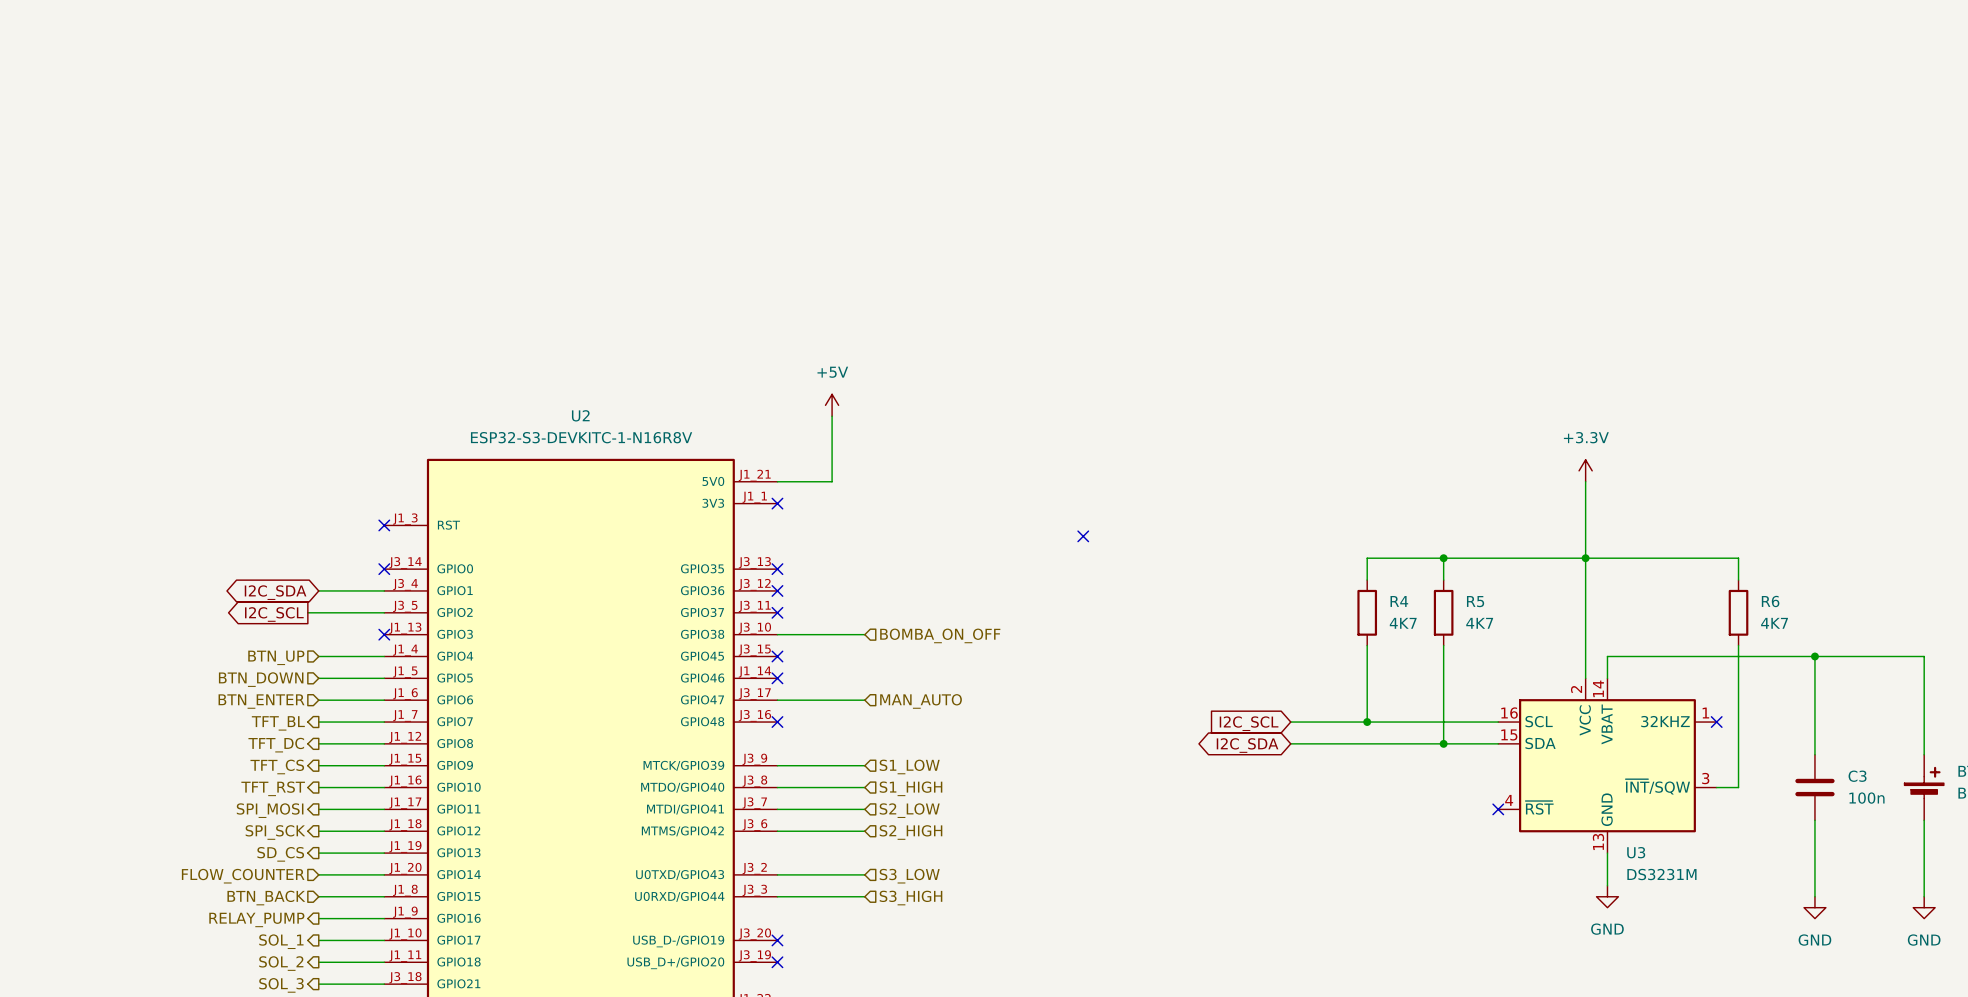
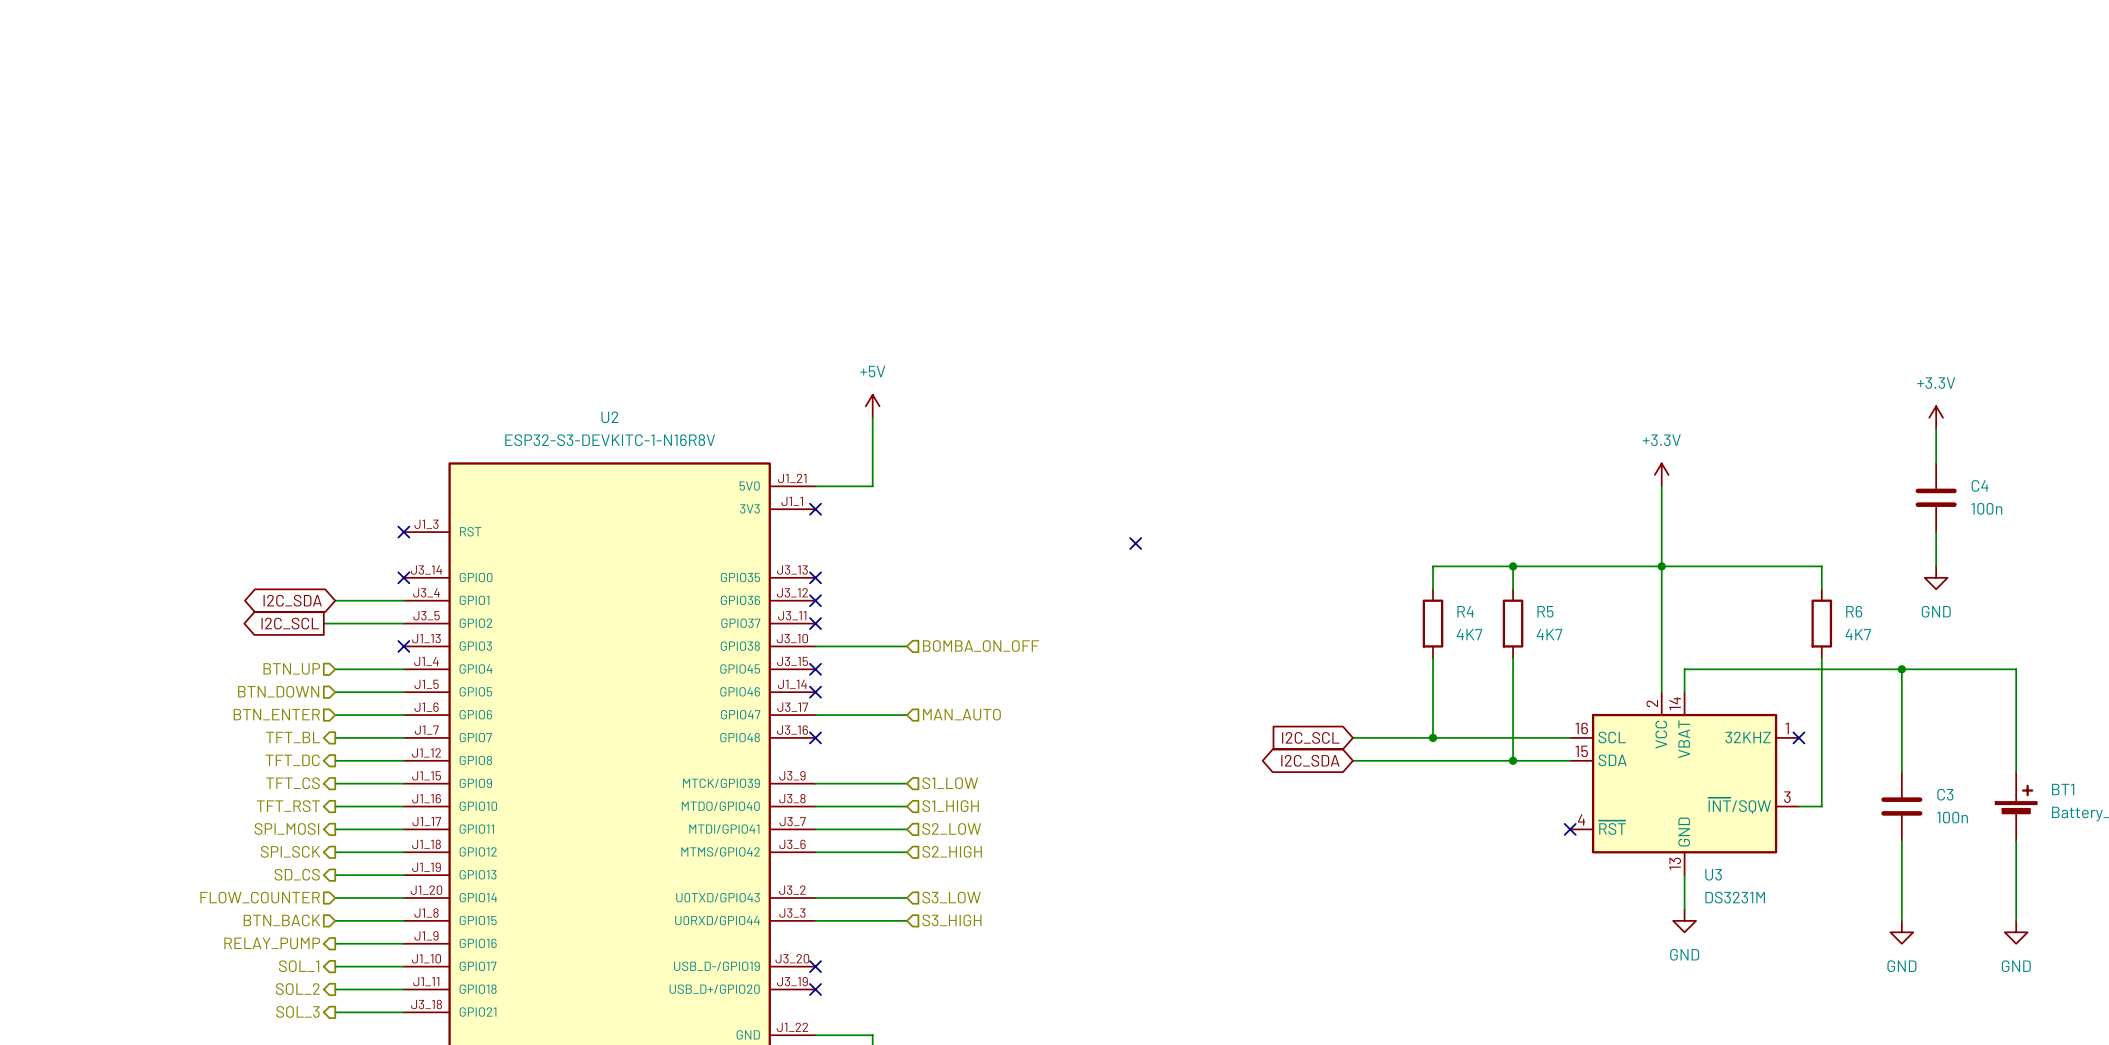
power symbol: none -> +3.3V (1936, 417)
wire: none -> (1936, 429) (1936, 463)
C4: none -> 100n (1936, 497)
wire: none -> (1936, 532) (1936, 566)
power symbol: none -> GND (1936, 577)

